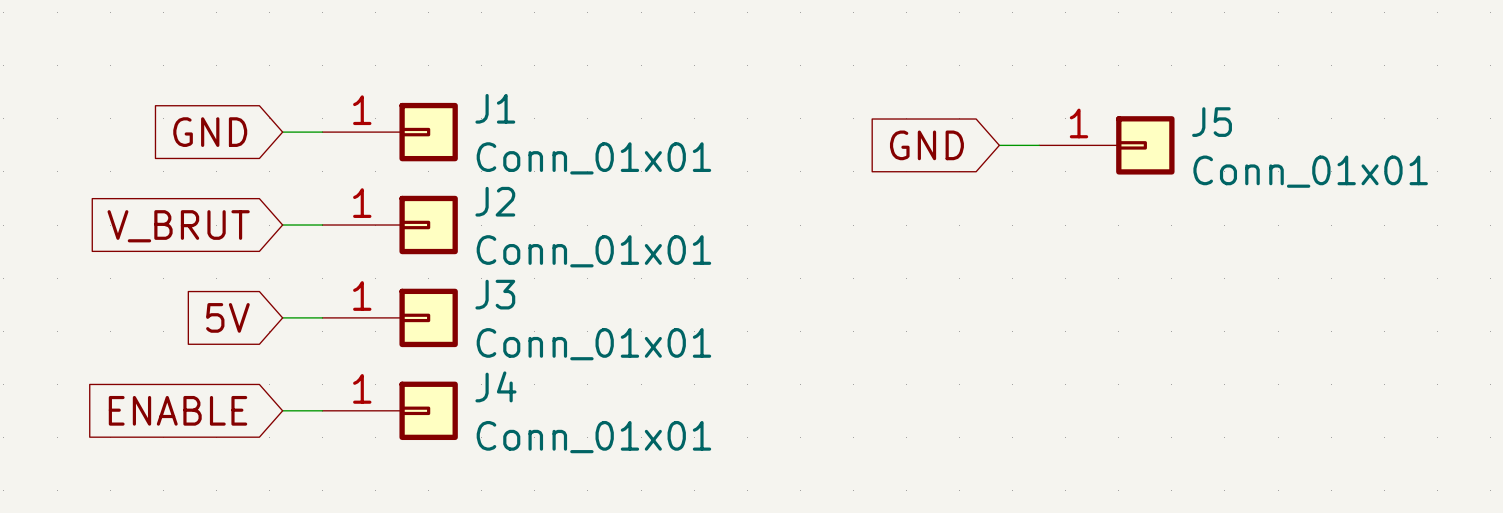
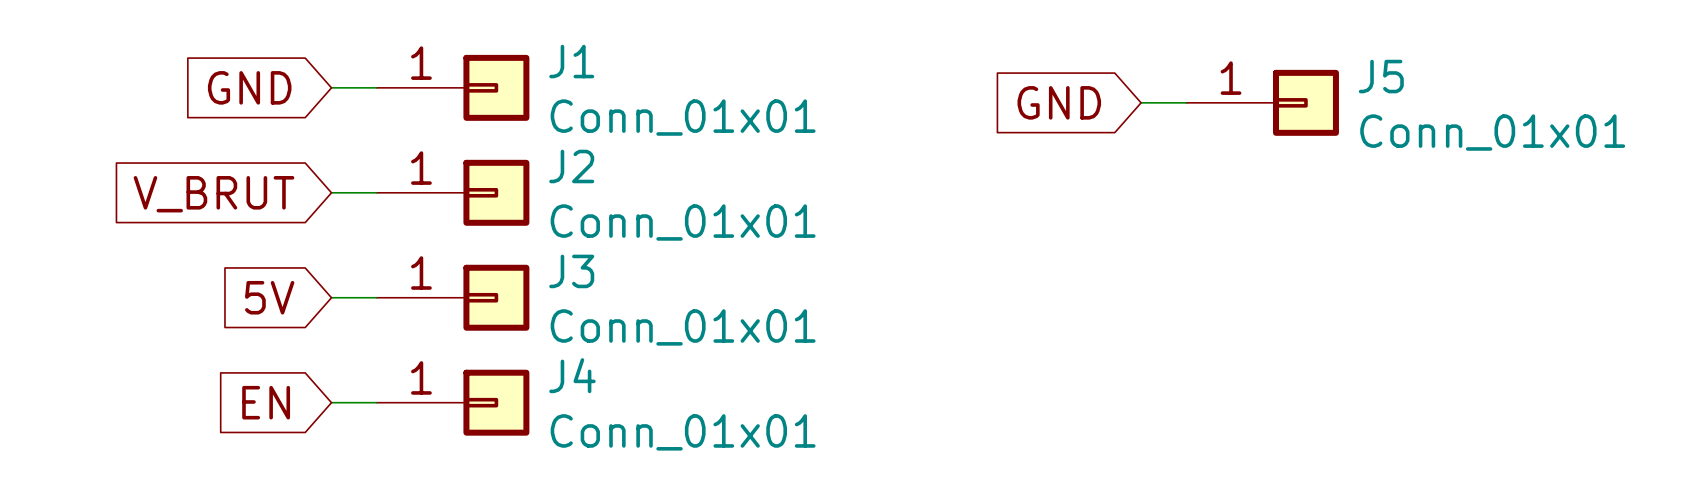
global label: ENABLE (178, 410) -> EN (266, 402)

